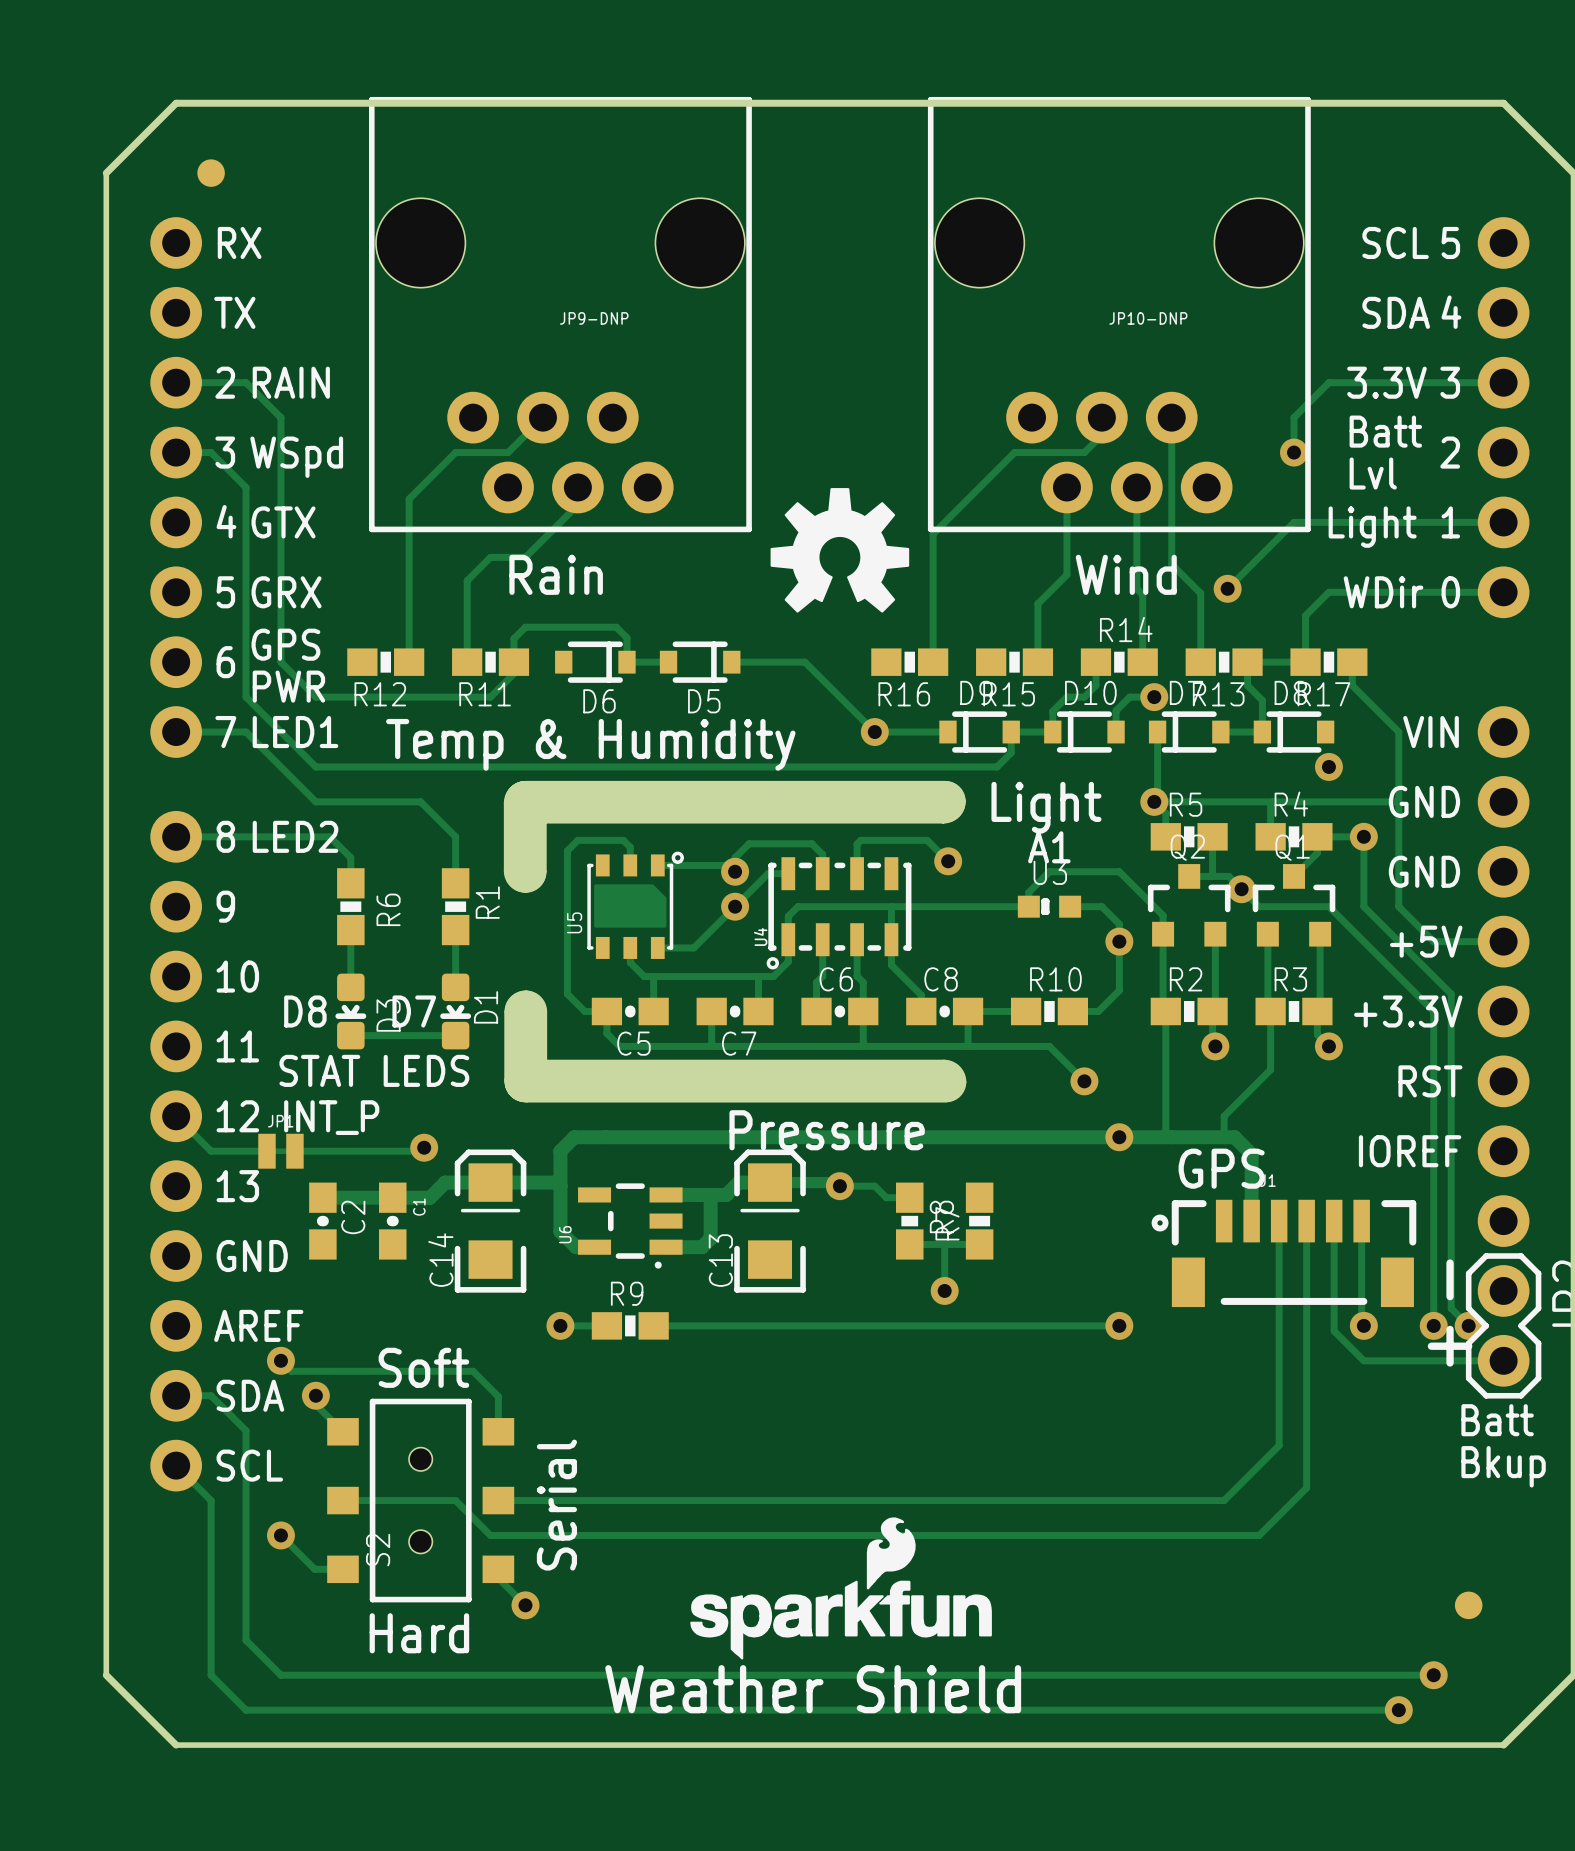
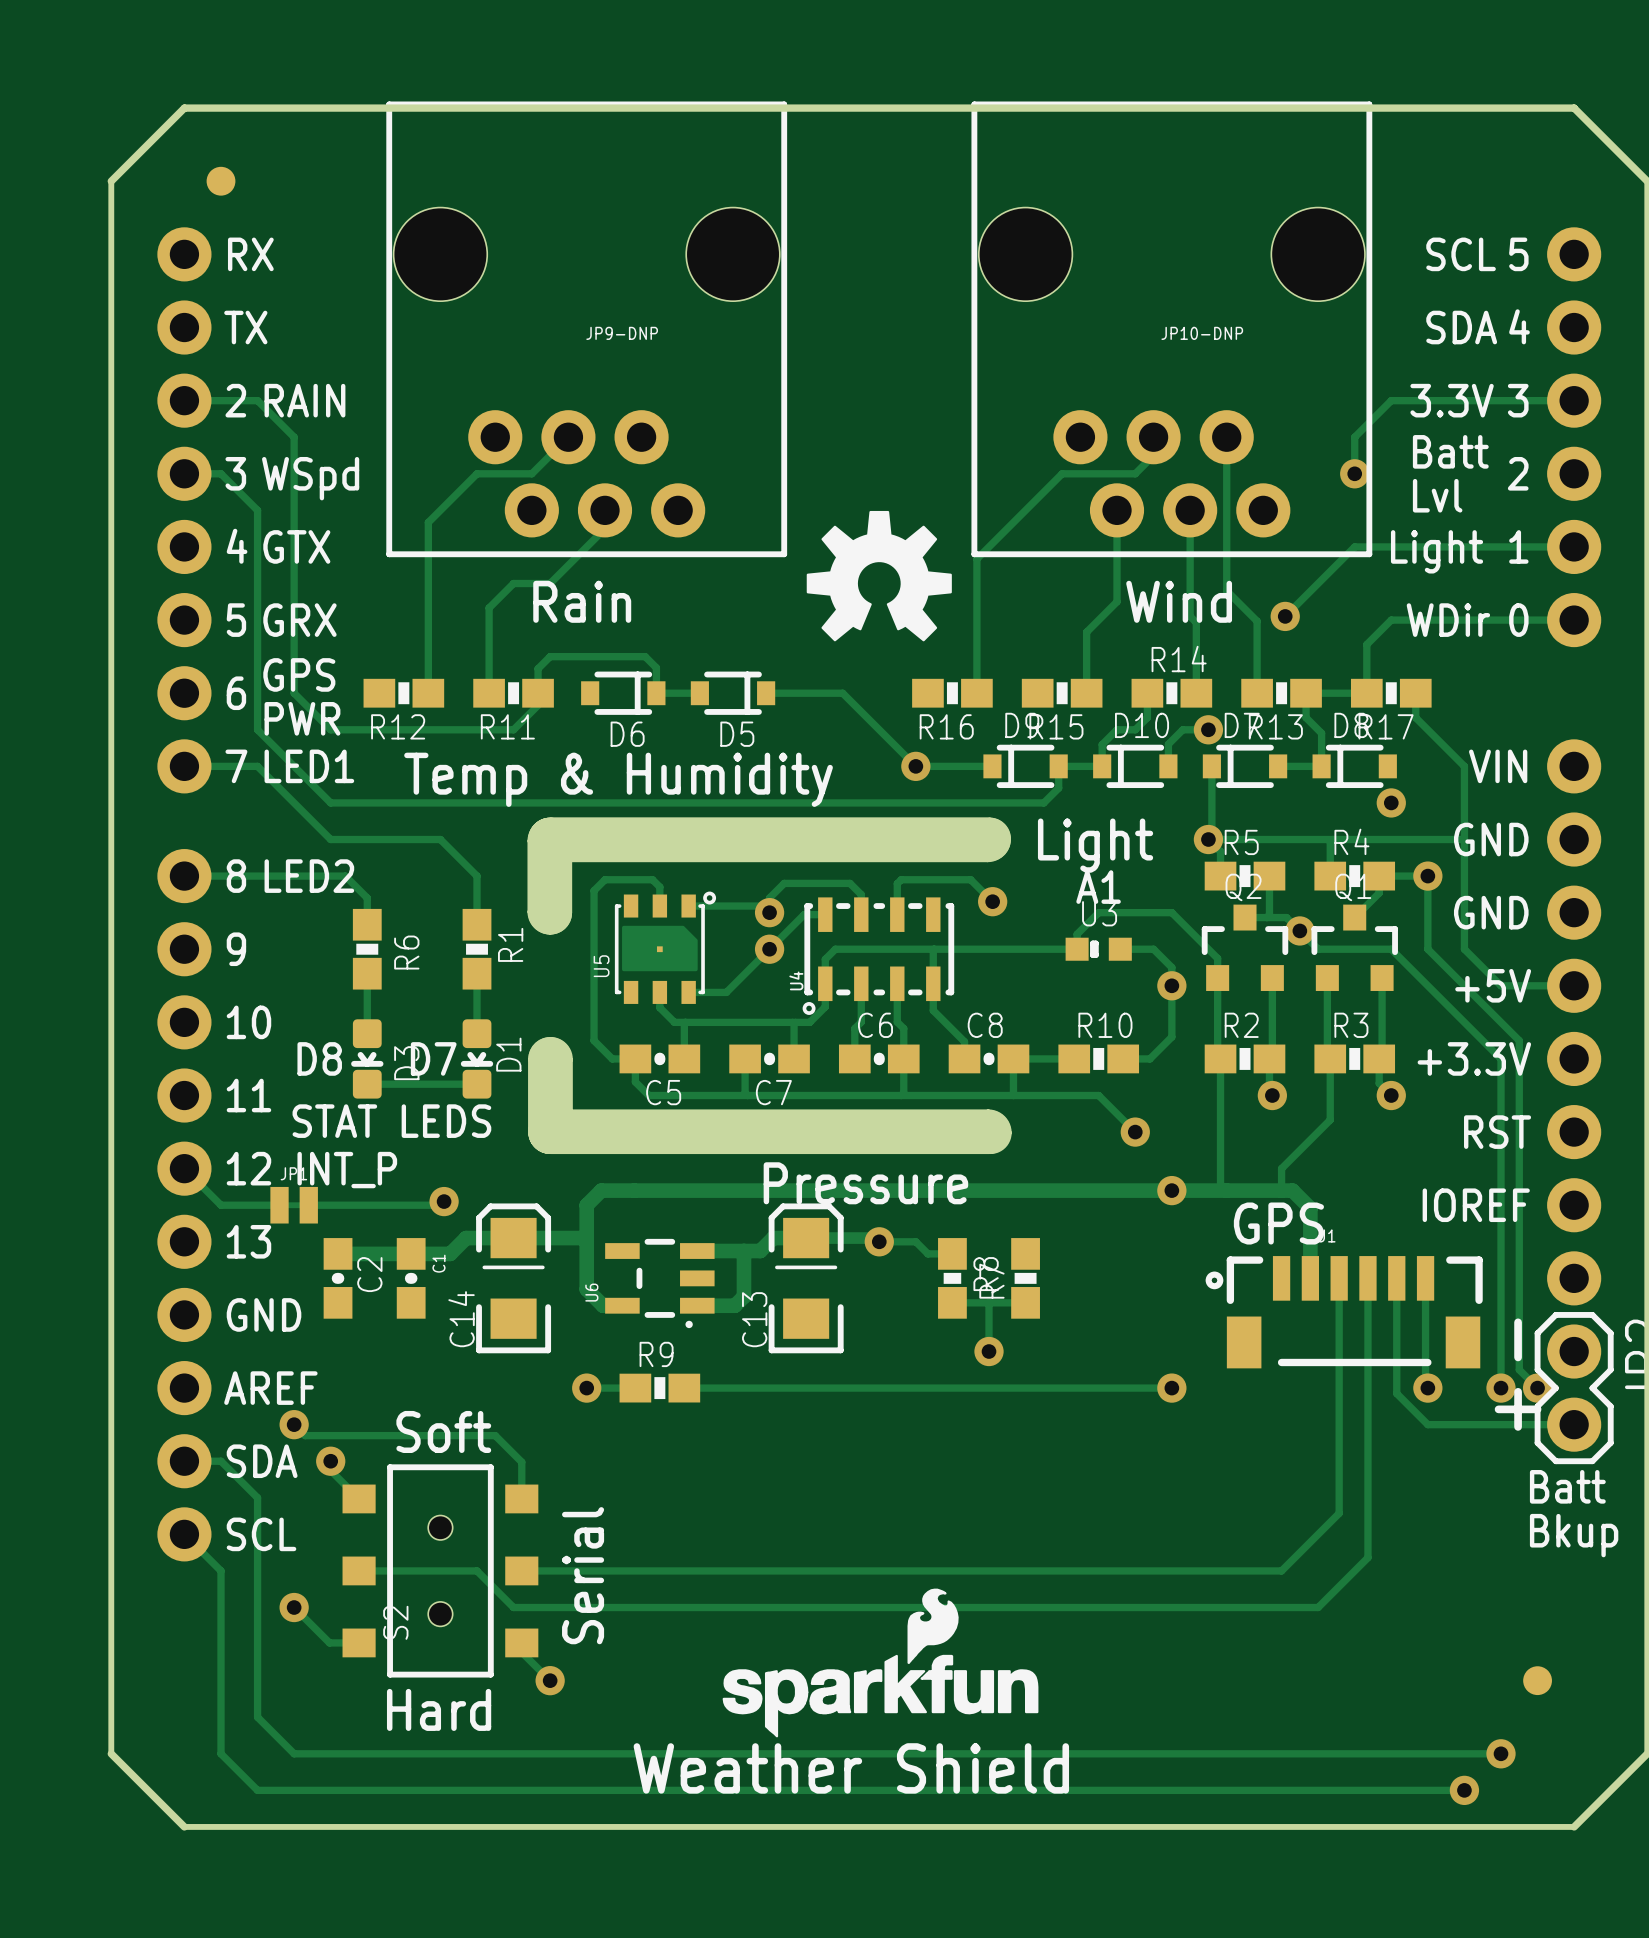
U5 footprint: [587, 851, 684, 959] -> [614, 891, 717, 1004]

